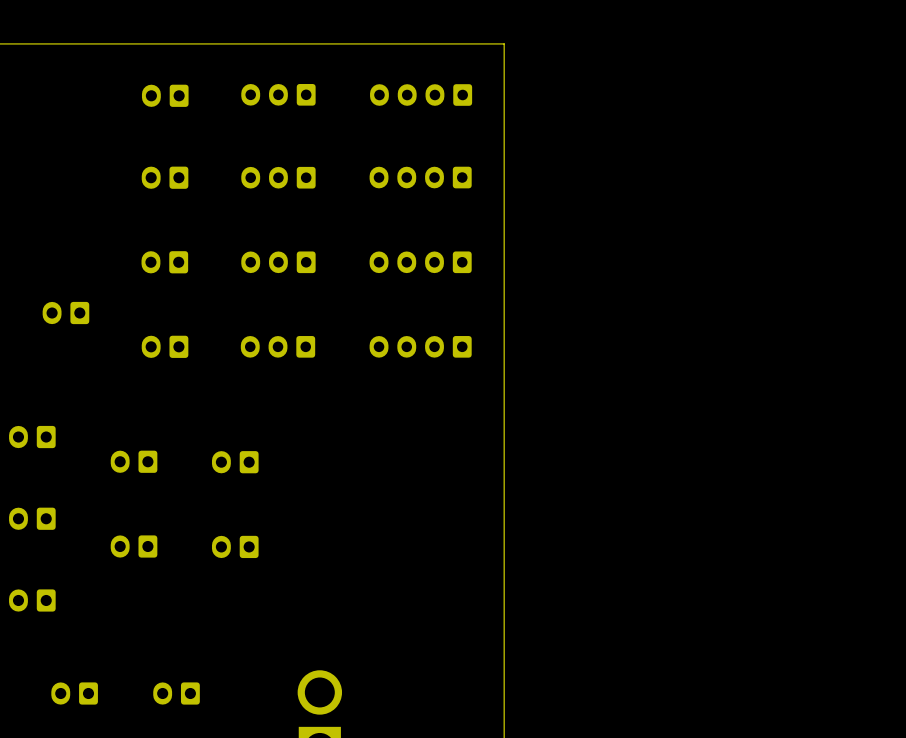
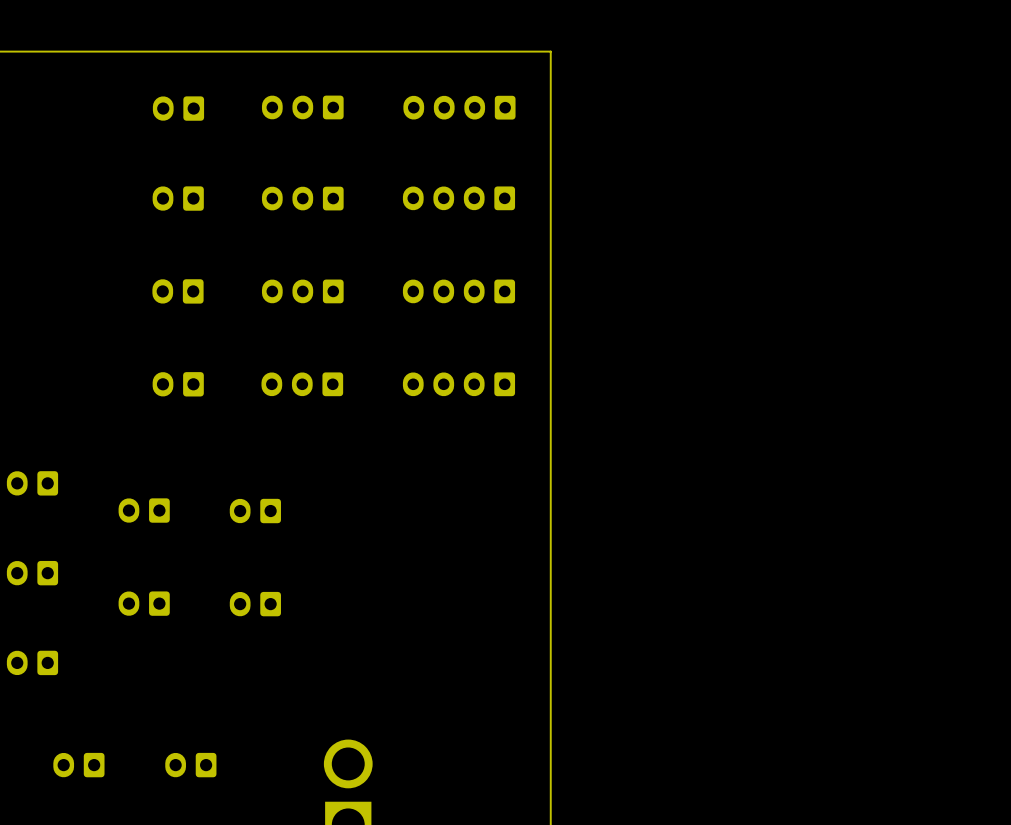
part: (65, 313) -> none

